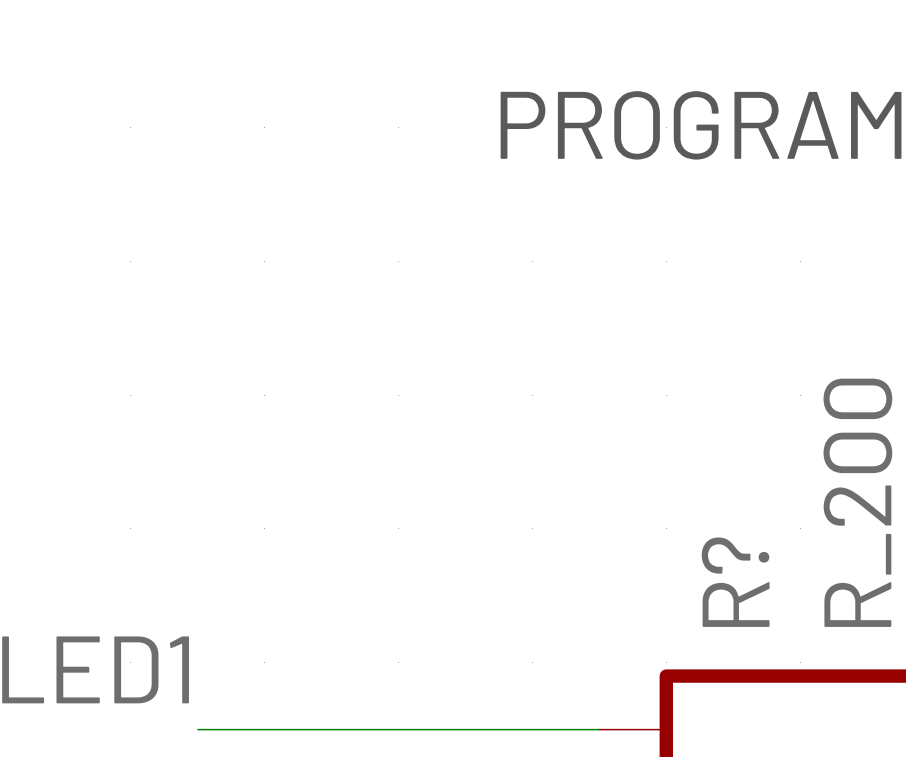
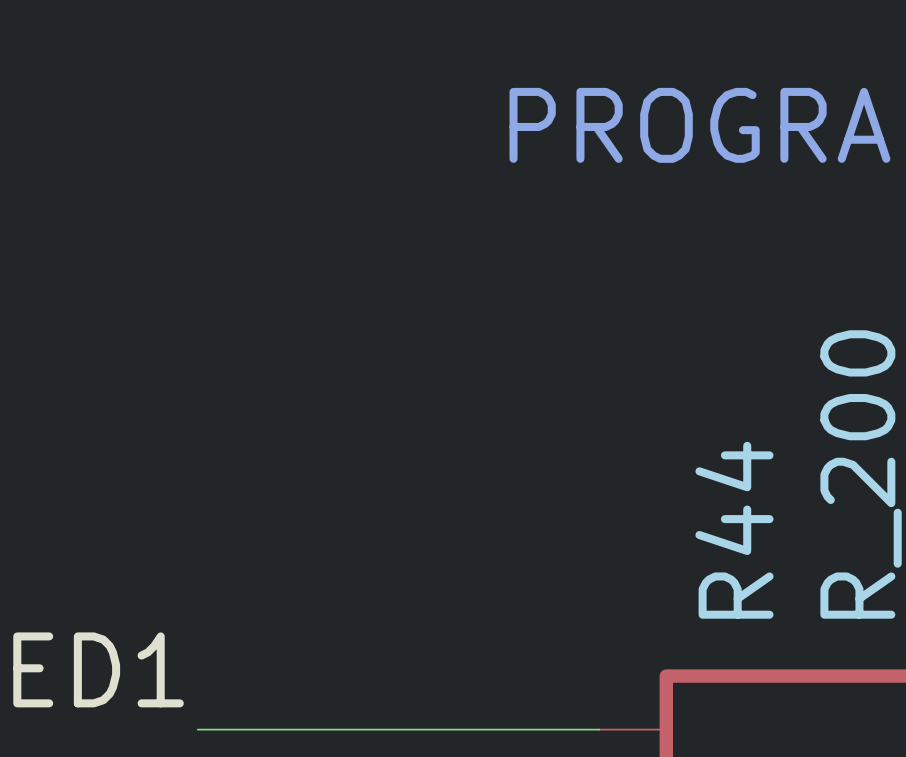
R? name: R? (735, 582) -> R44 (734, 530)

